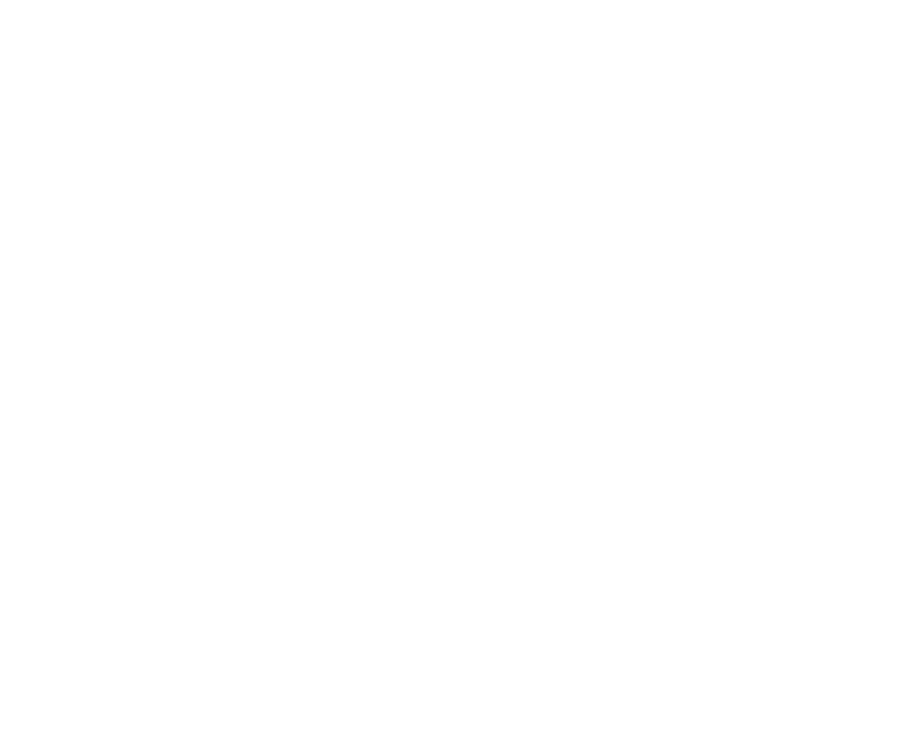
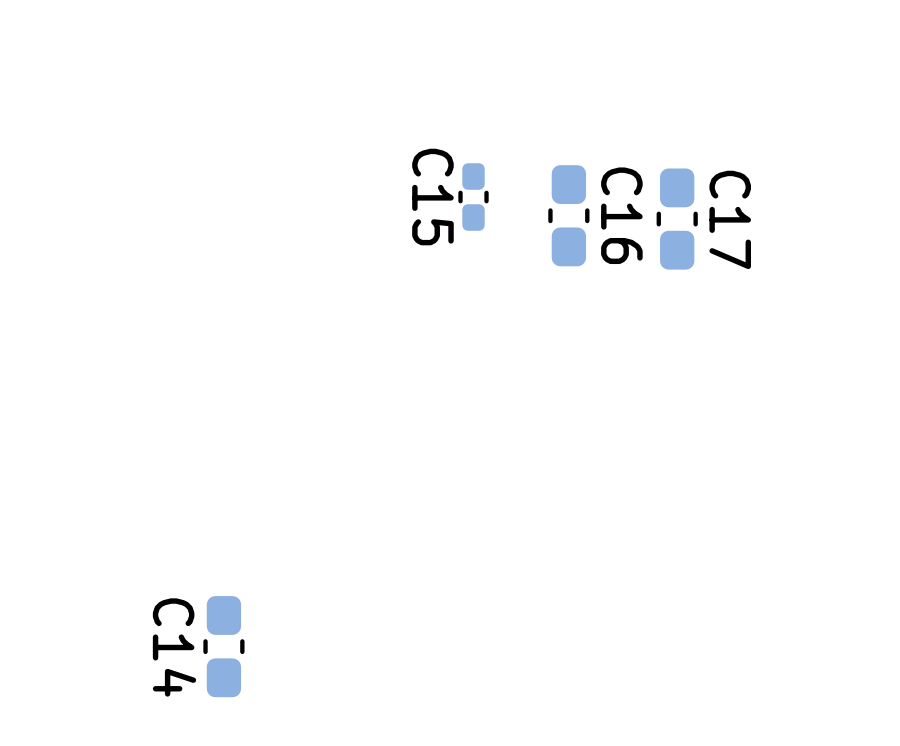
C15: none -> (473, 197)
C16: none -> (568, 215)
C17: none -> (677, 219)
C14: none -> (223, 646)

